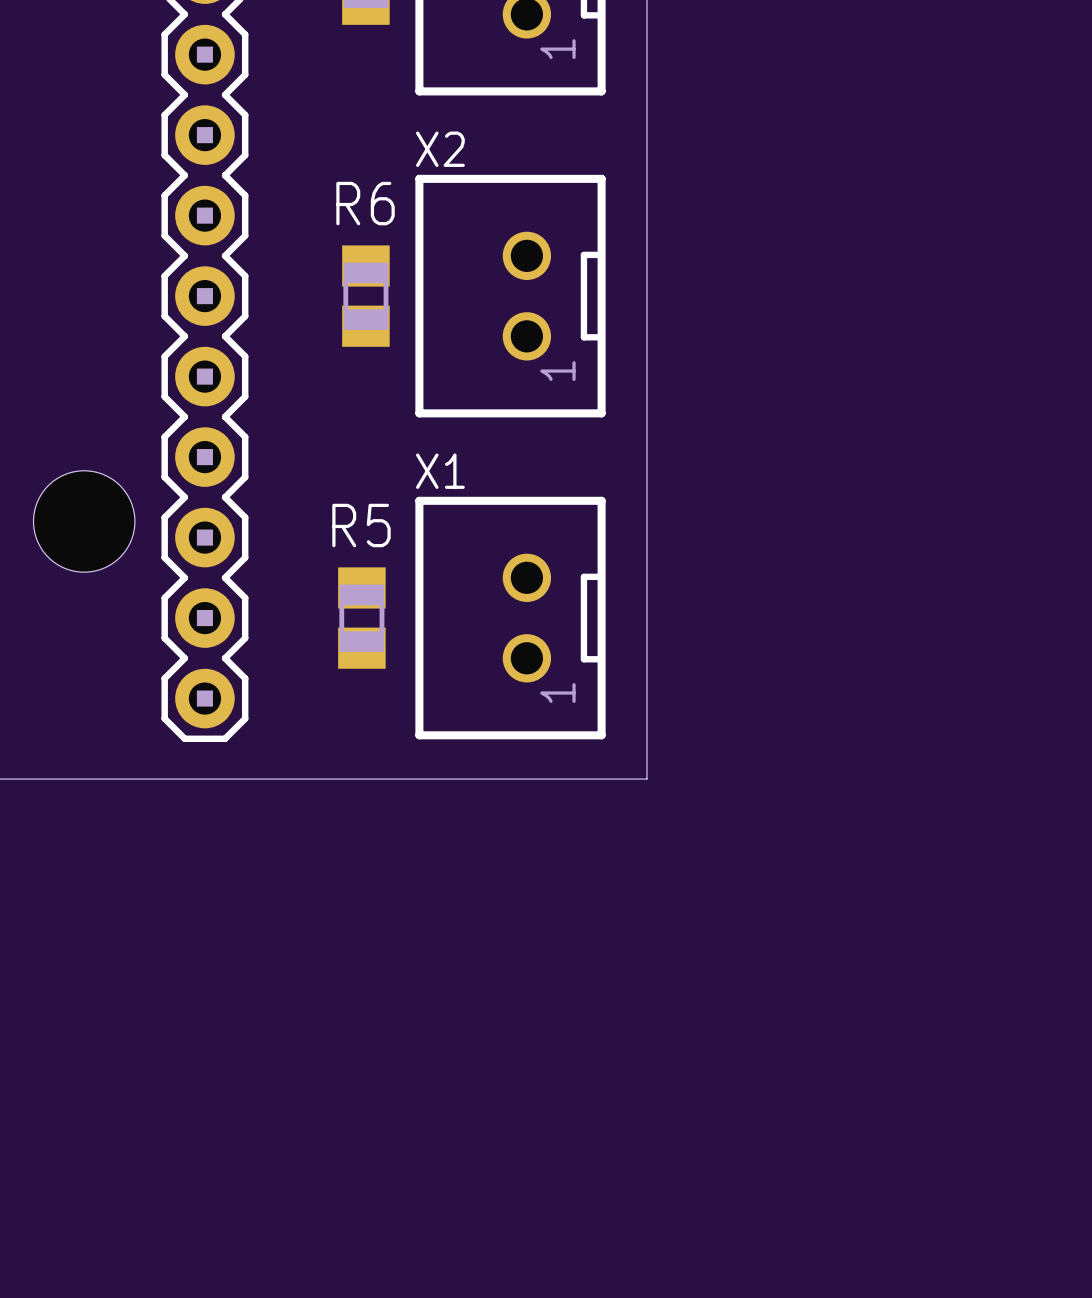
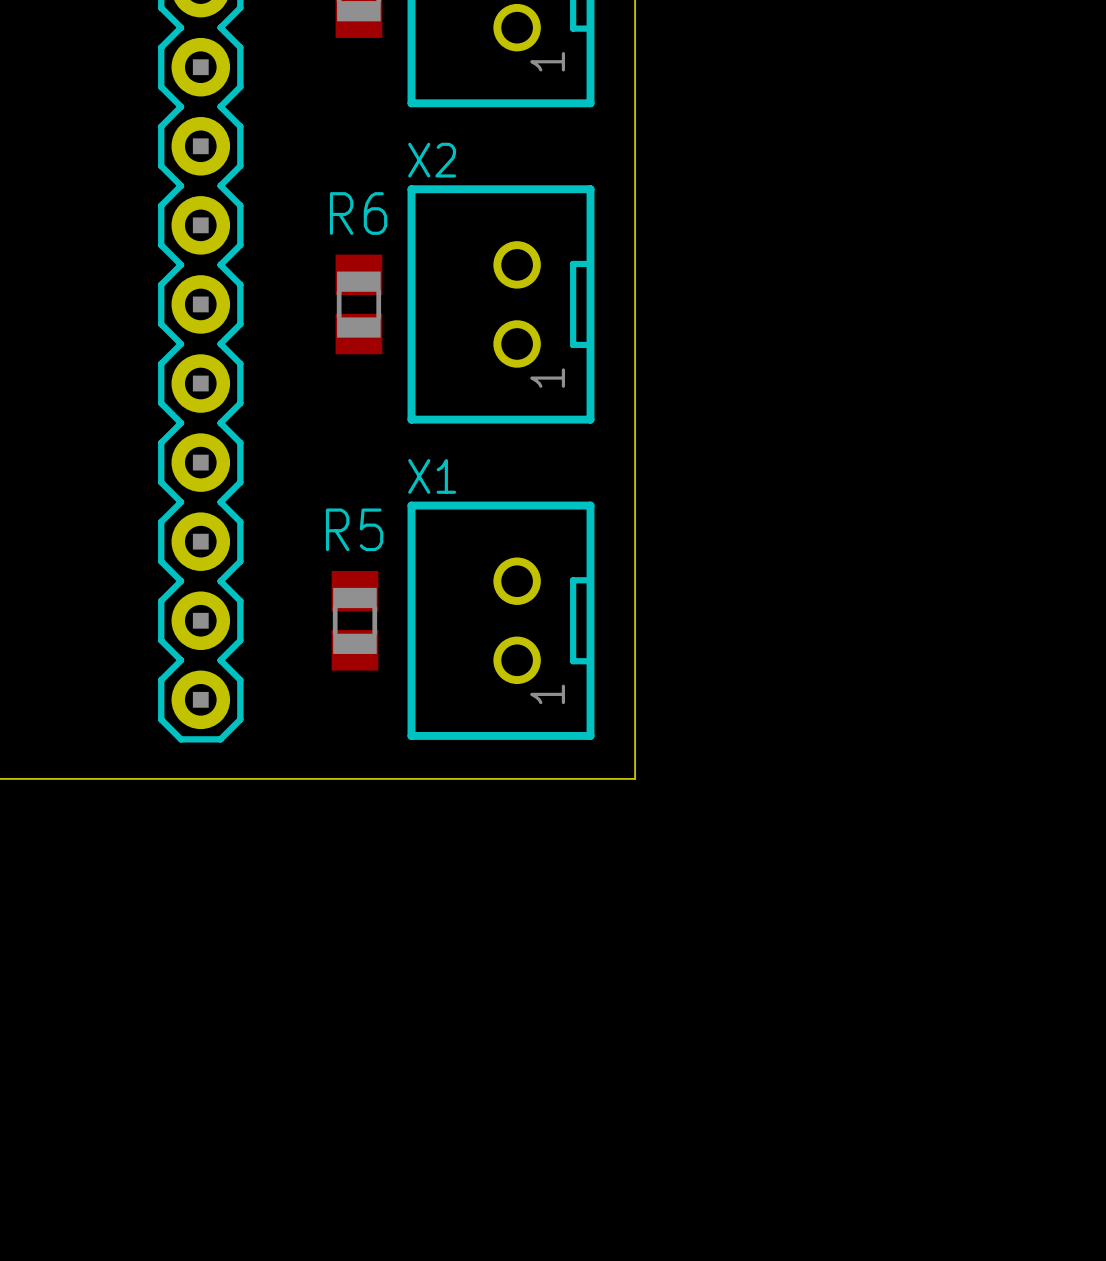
hole: (84, 521) -> none

